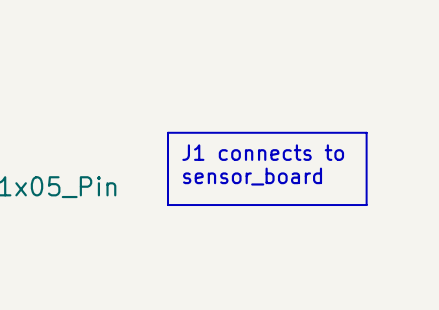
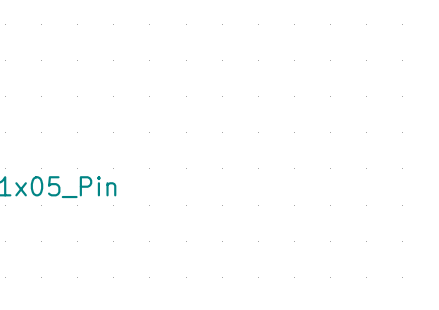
line: (168, 132) (366, 132) (366, 205) (168, 205) (168, 132) -> none
text: J1 connects to (263, 152) -> none
text: sensor_board (252, 176) -> none

